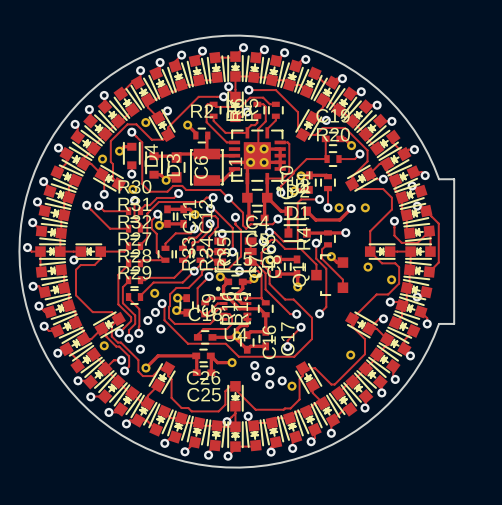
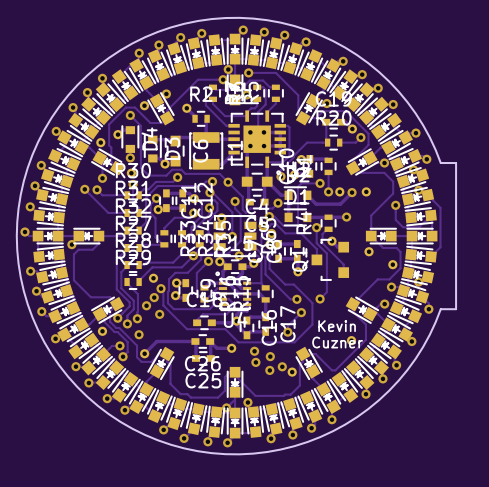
text: none -> Kevin (337, 326)
text: none -> Cuzner (337, 342)

